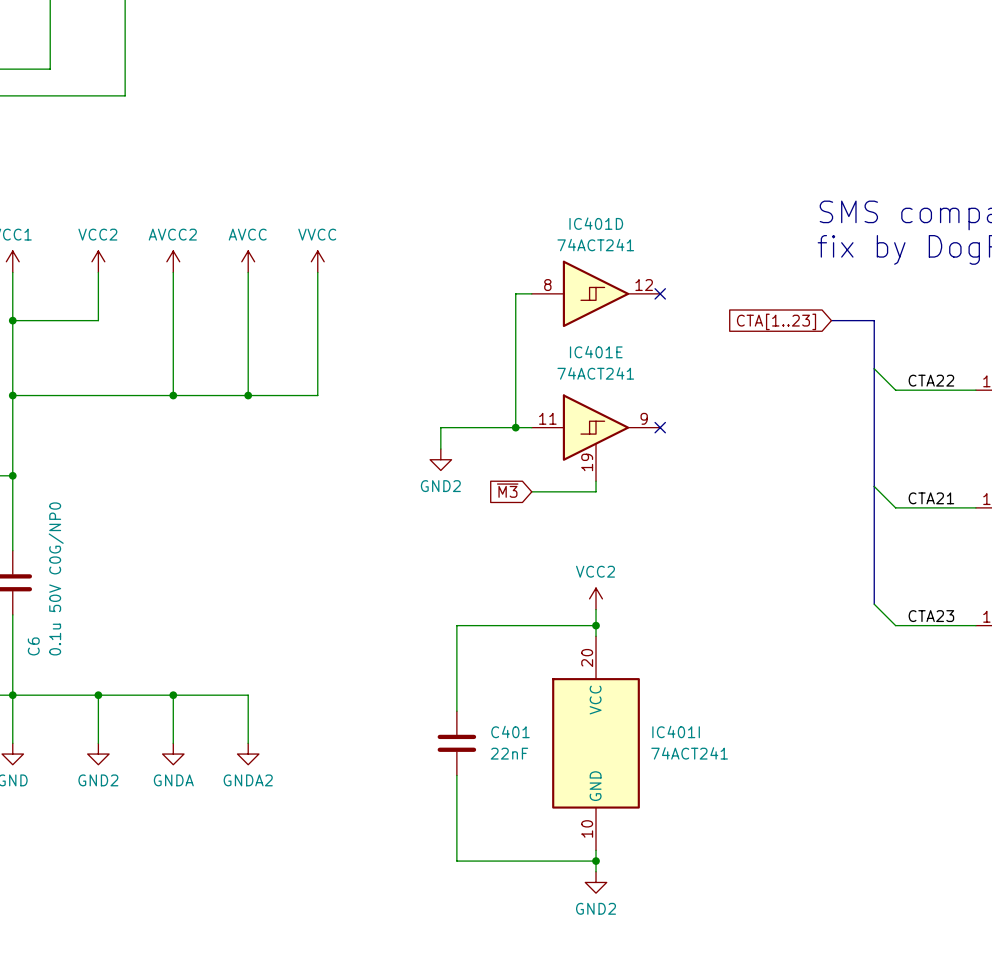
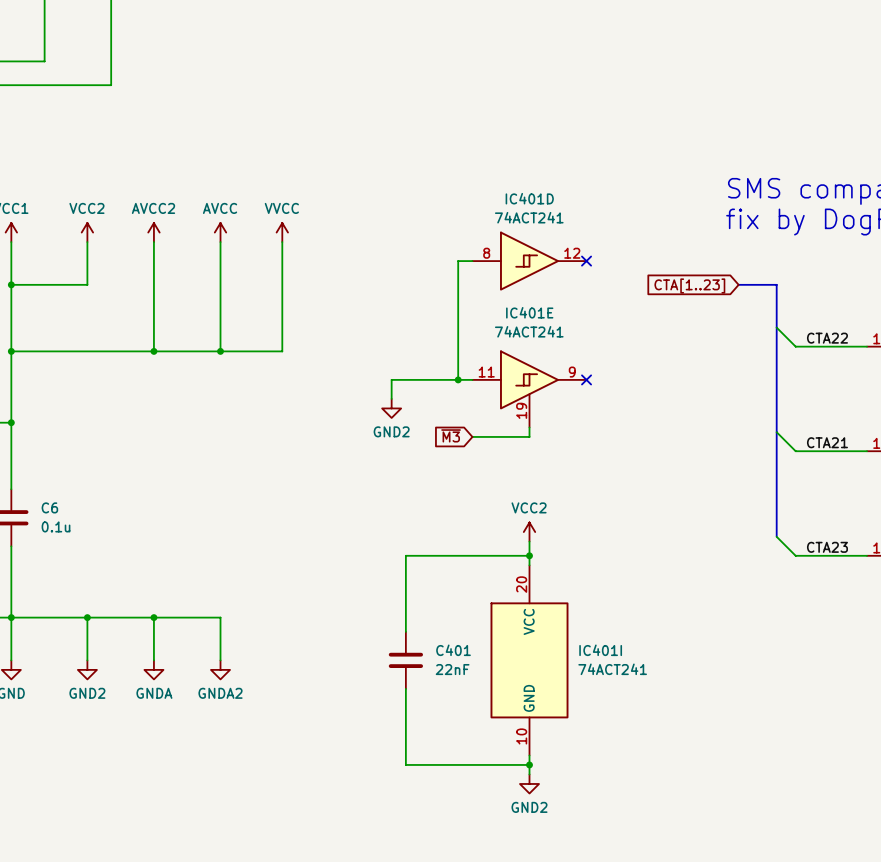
C6 value: 0.1u 50V C0G/NP0 (56, 578) -> 0.1u (56, 526)
C6 name rotation: 0° (33, 646) -> 90° clockwise (49, 507)
C6 name position: C6 (33, 646) -> C6 (49, 507)

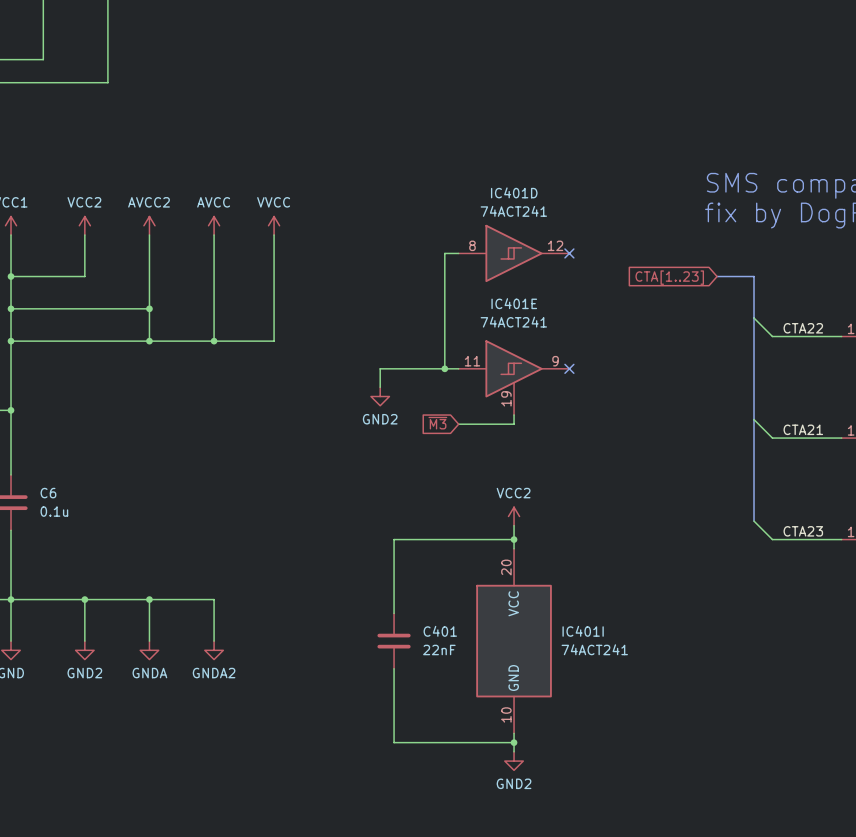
wire: none -> (11, 308) (149, 308)
junction: none -> (11, 308)
junction: none -> (149, 308)

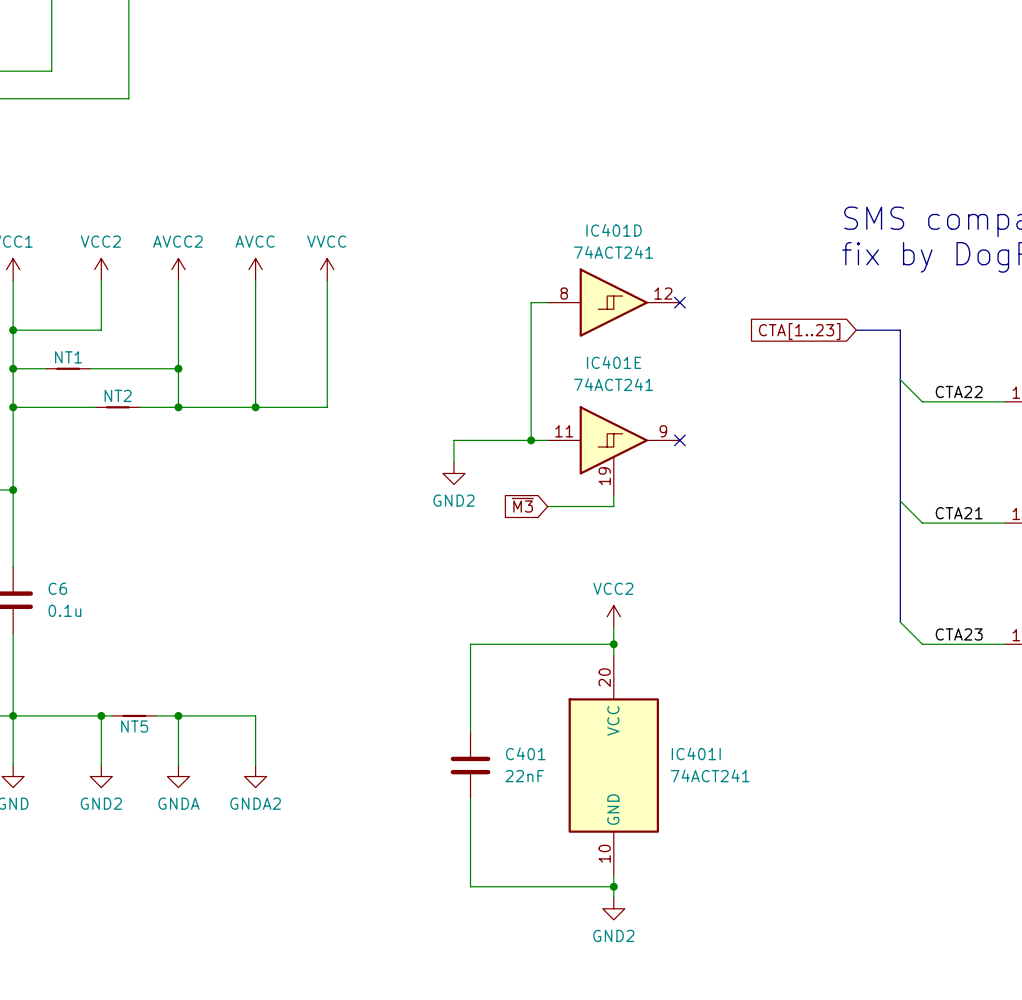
NT1: none -> (68, 368)
NT2: none -> (117, 407)
NT5: none -> (134, 715)

